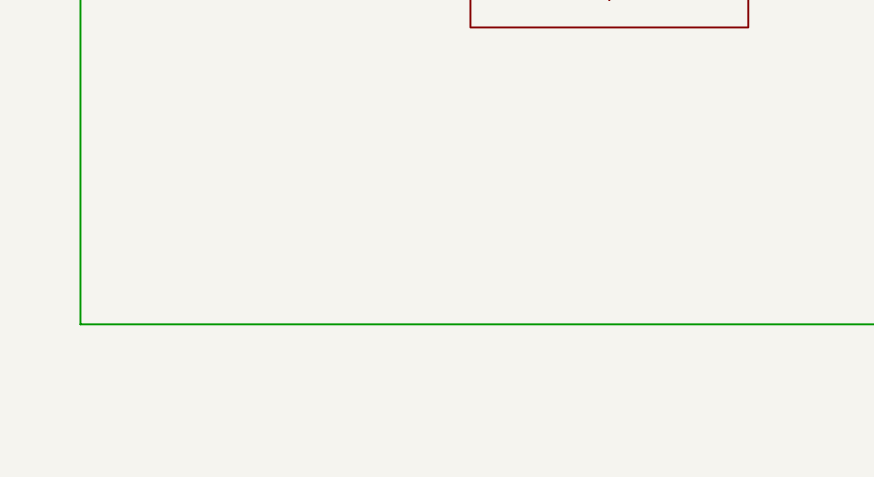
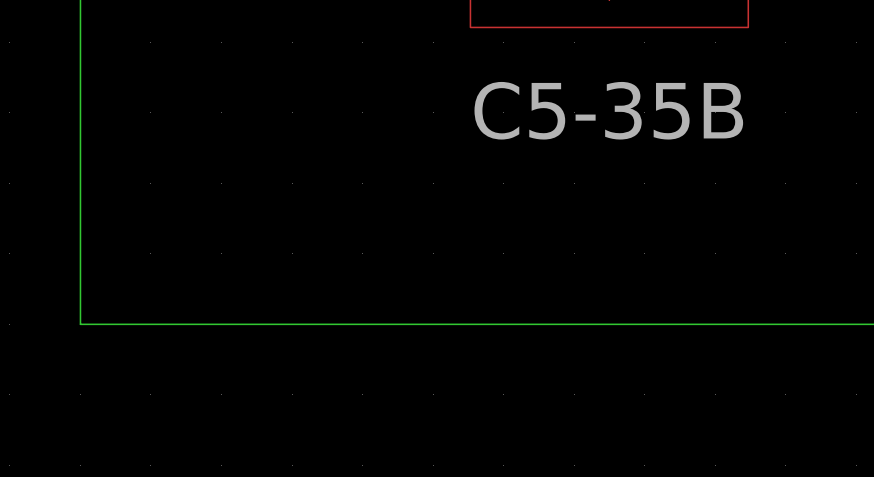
part text: none -> C5-35В (608, 110)

